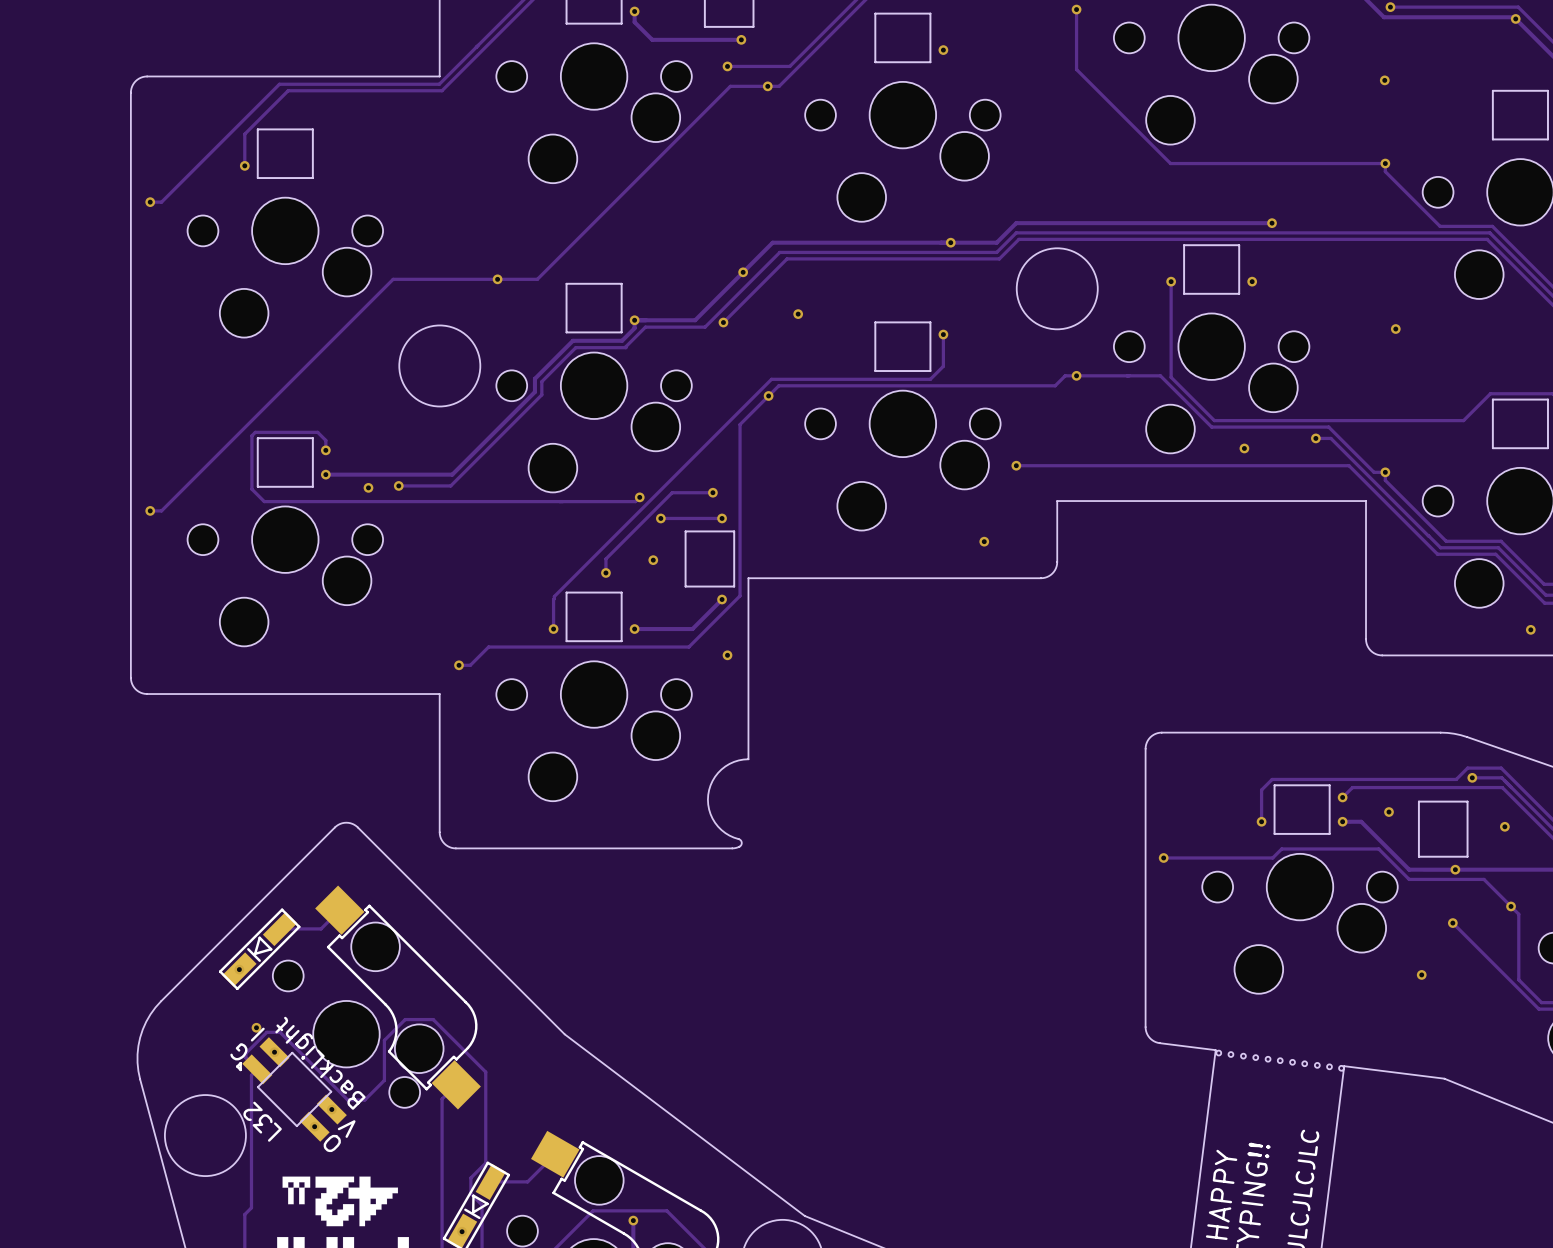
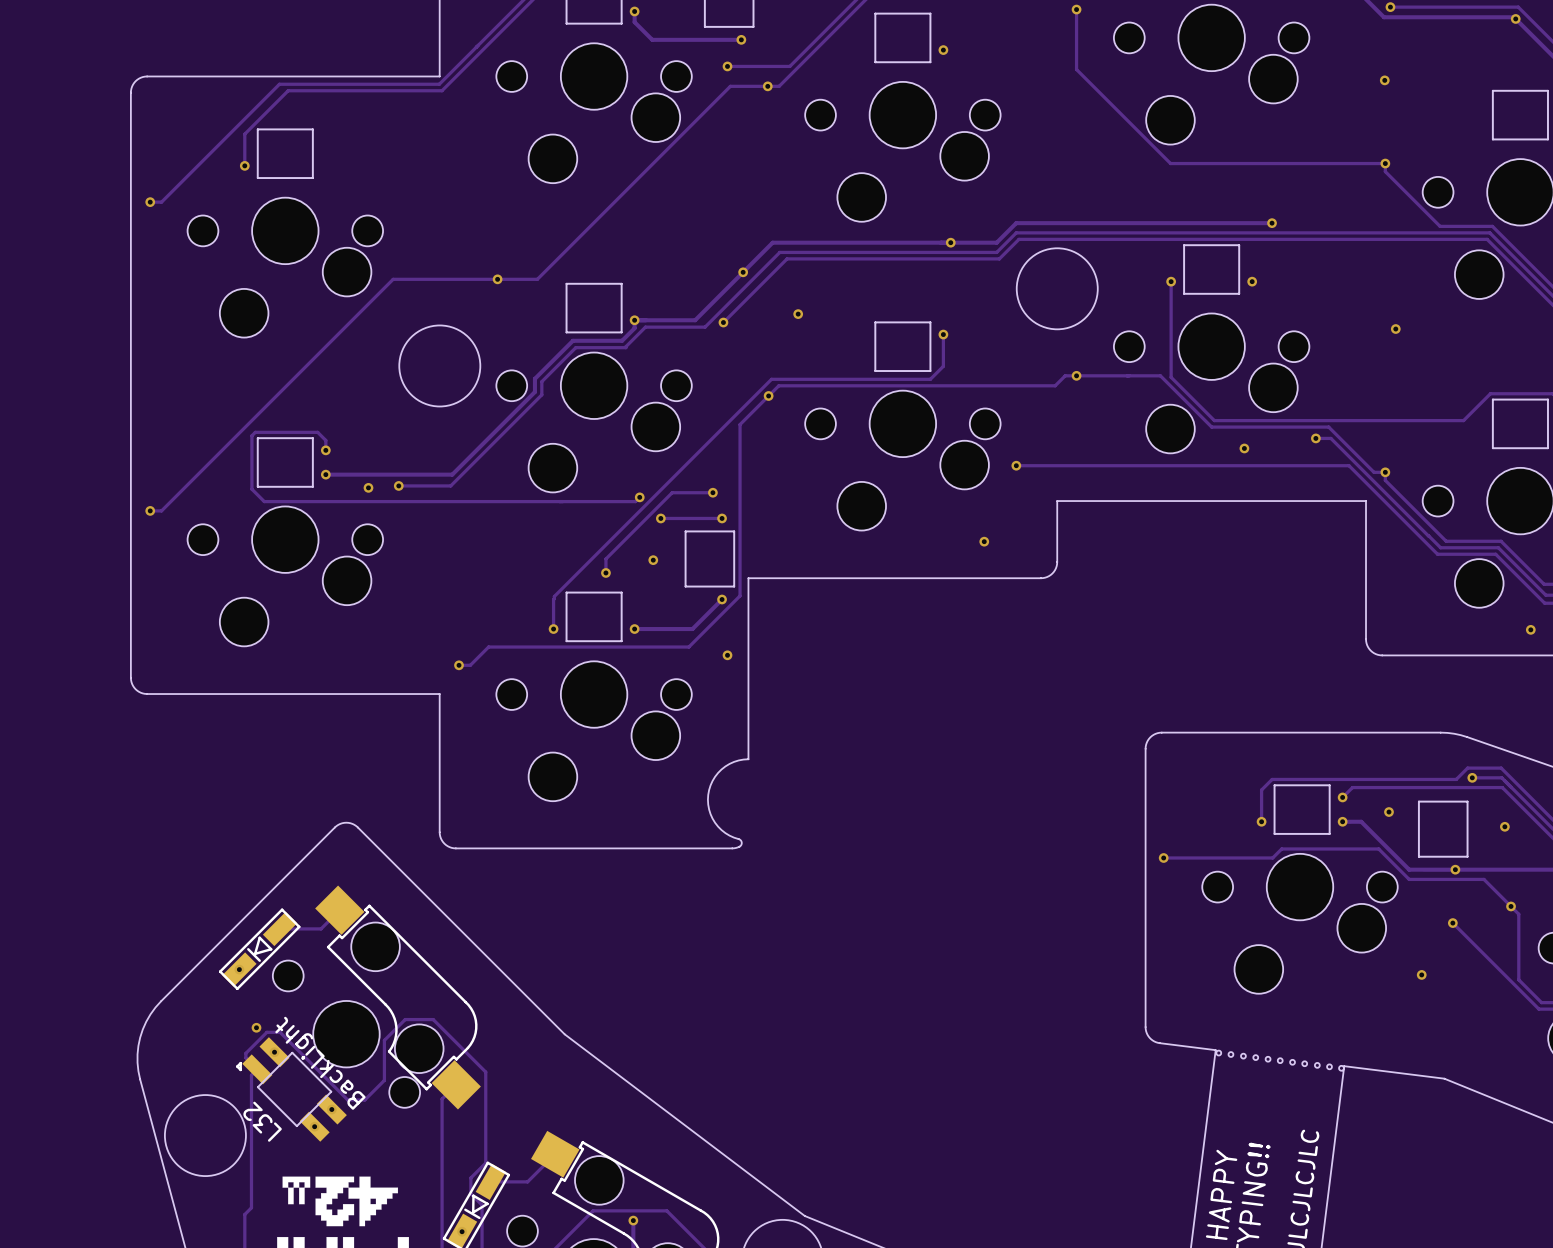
L32 text: I (257, 1034) -> none
L32 text: G (238, 1051) -> none
L32 text: V (346, 1129) -> none
L32 text: O (332, 1143) -> none

